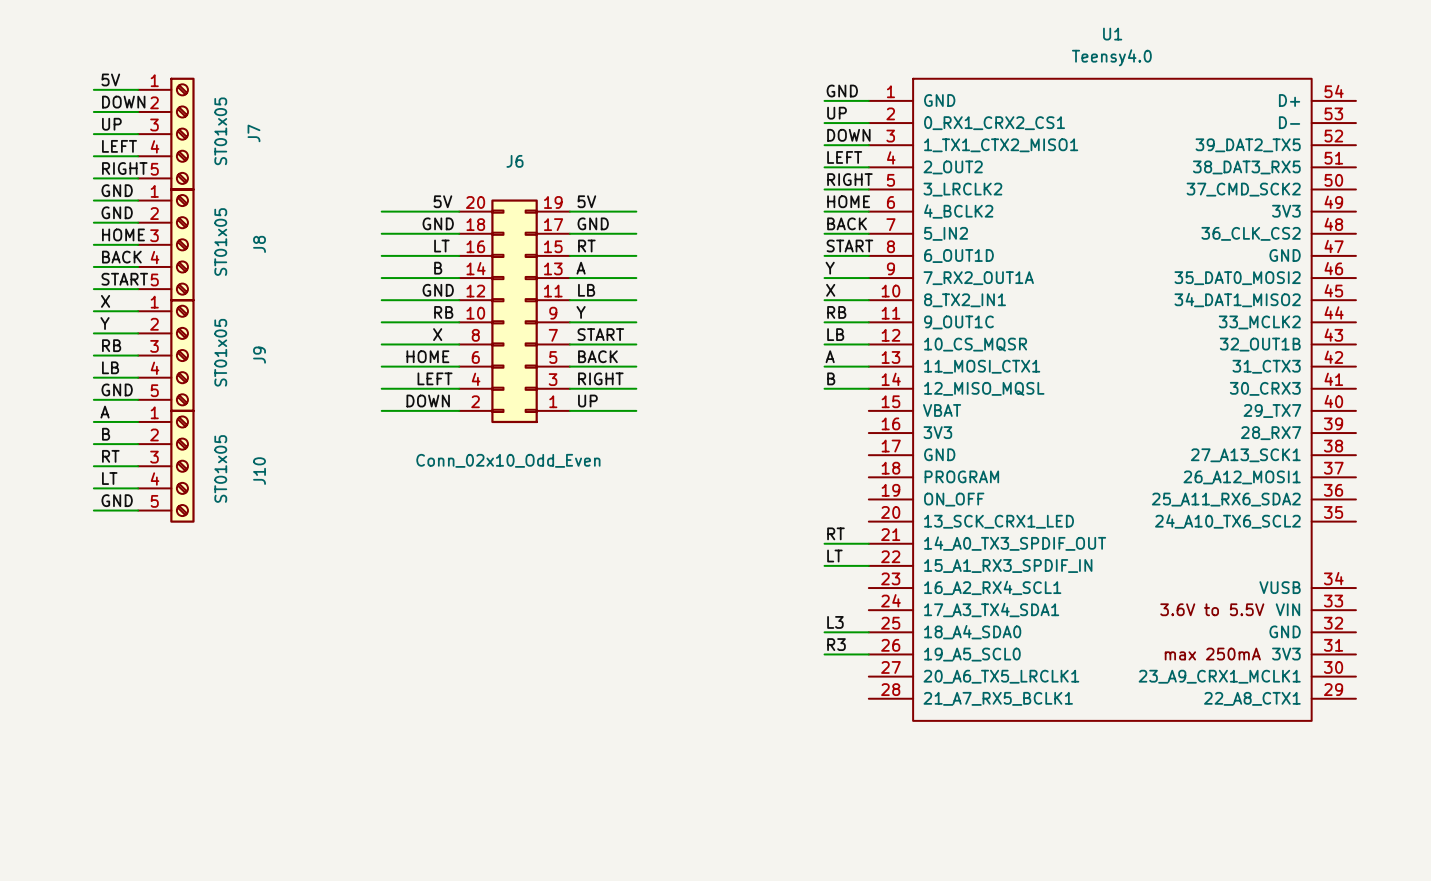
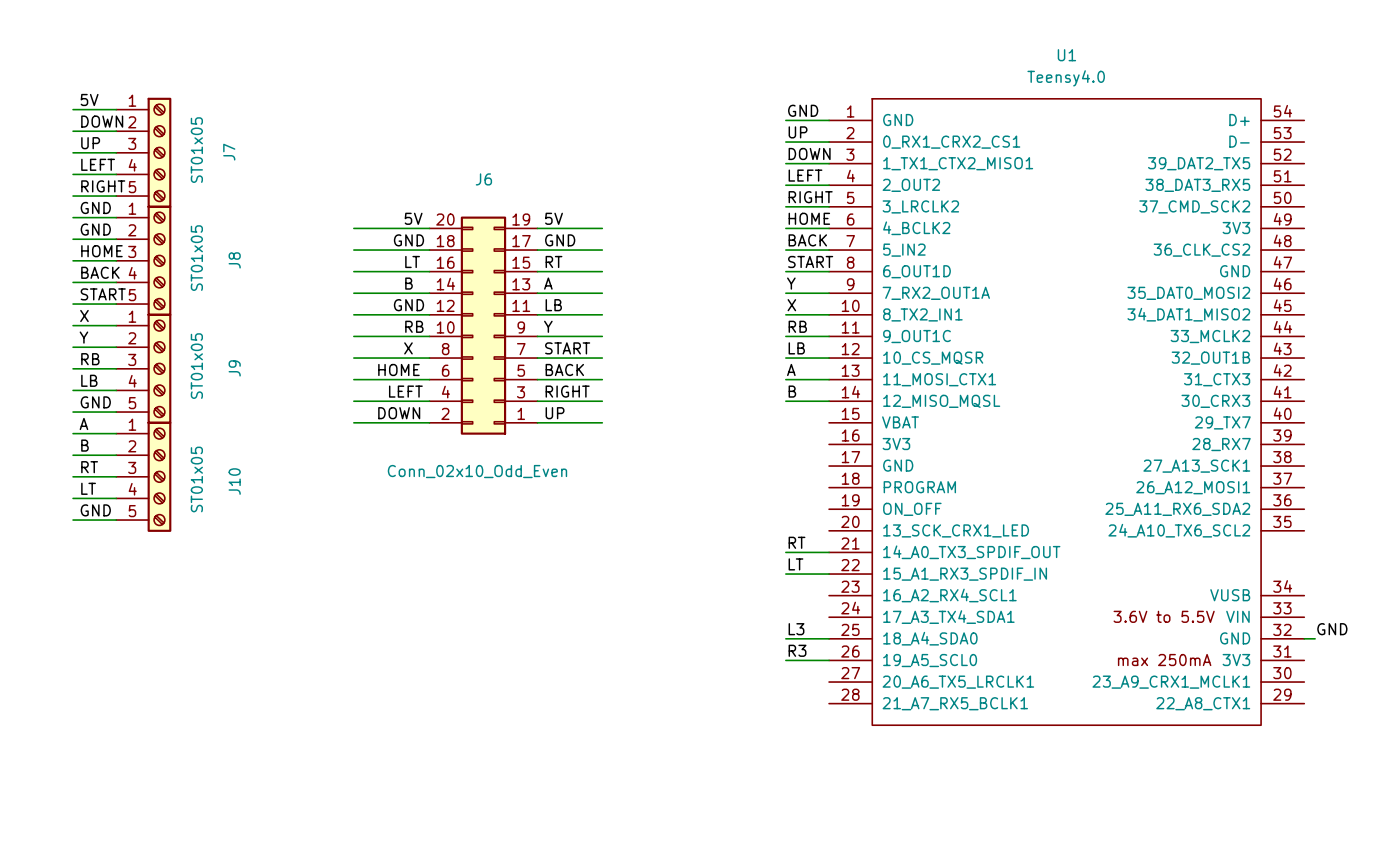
label: none -> GND (1332, 629)
wire: none -> (1304, 638) (1315, 638)

